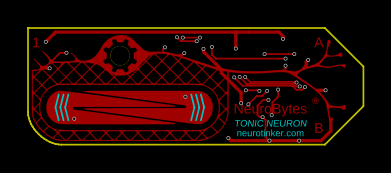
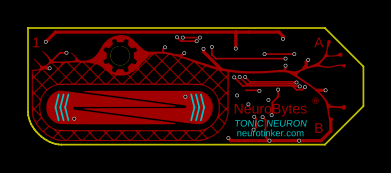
track: (221, 69) (221, 72) (241, 92) (241, 103) -> none
via: (245, 90) -> none
track: (267, 90) (261, 96) (256, 96) (248, 104) -> none
via: (267, 90) -> none
via: none -> (237, 95)
track: (268, 99) (263, 99) (257, 105) (257, 114) (262, 117) -> none
via: (241, 103) -> none
track: none -> (254, 116) (256, 118) (256, 127) (253, 129)
via: none -> (254, 116)
via: none -> (253, 129)

